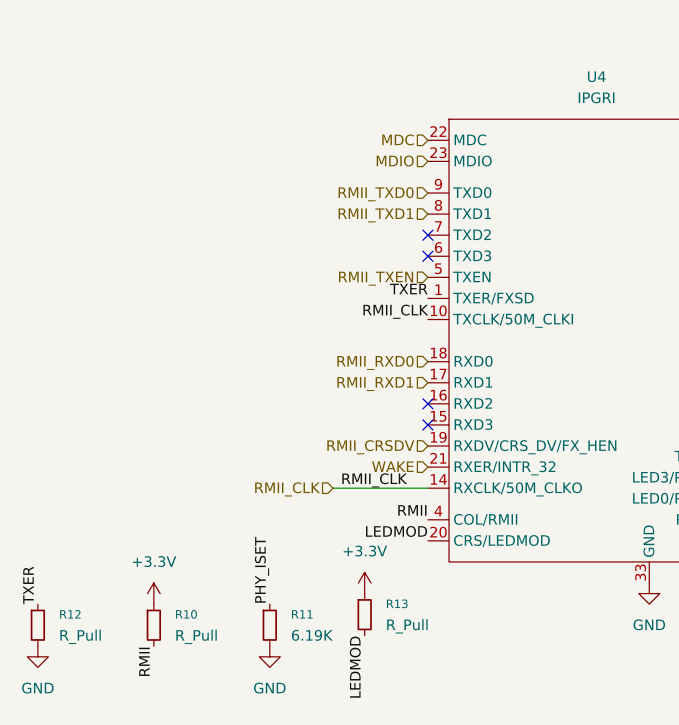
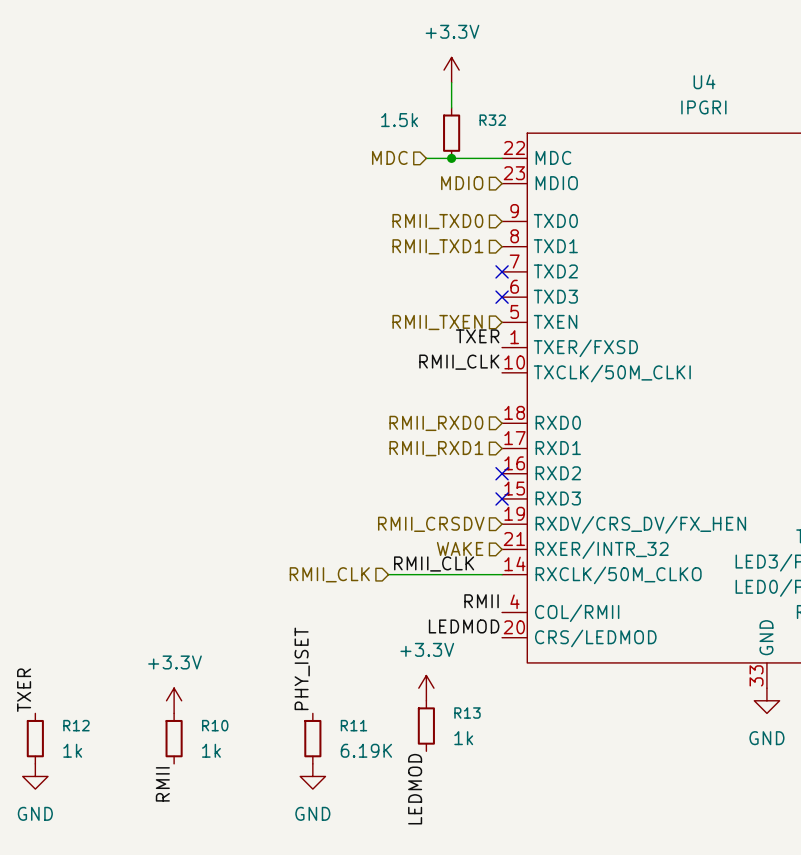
power symbol: none -> +3.3V (451, 70)
wire: none -> (451, 82) (451, 107)
R32: none -> 1.5k (451, 133)
hierarchical label position: MDC (398, 139) -> MDC (389, 157)
wire: none -> (426, 158) (502, 158)
junction: none -> (451, 158)
R13 value: R_Pull (407, 626) -> 1k (463, 738)
R12 value: R_Pull (80, 636) -> 1k (72, 750)
R10 value: R_Pull (196, 636) -> 1k (211, 750)

